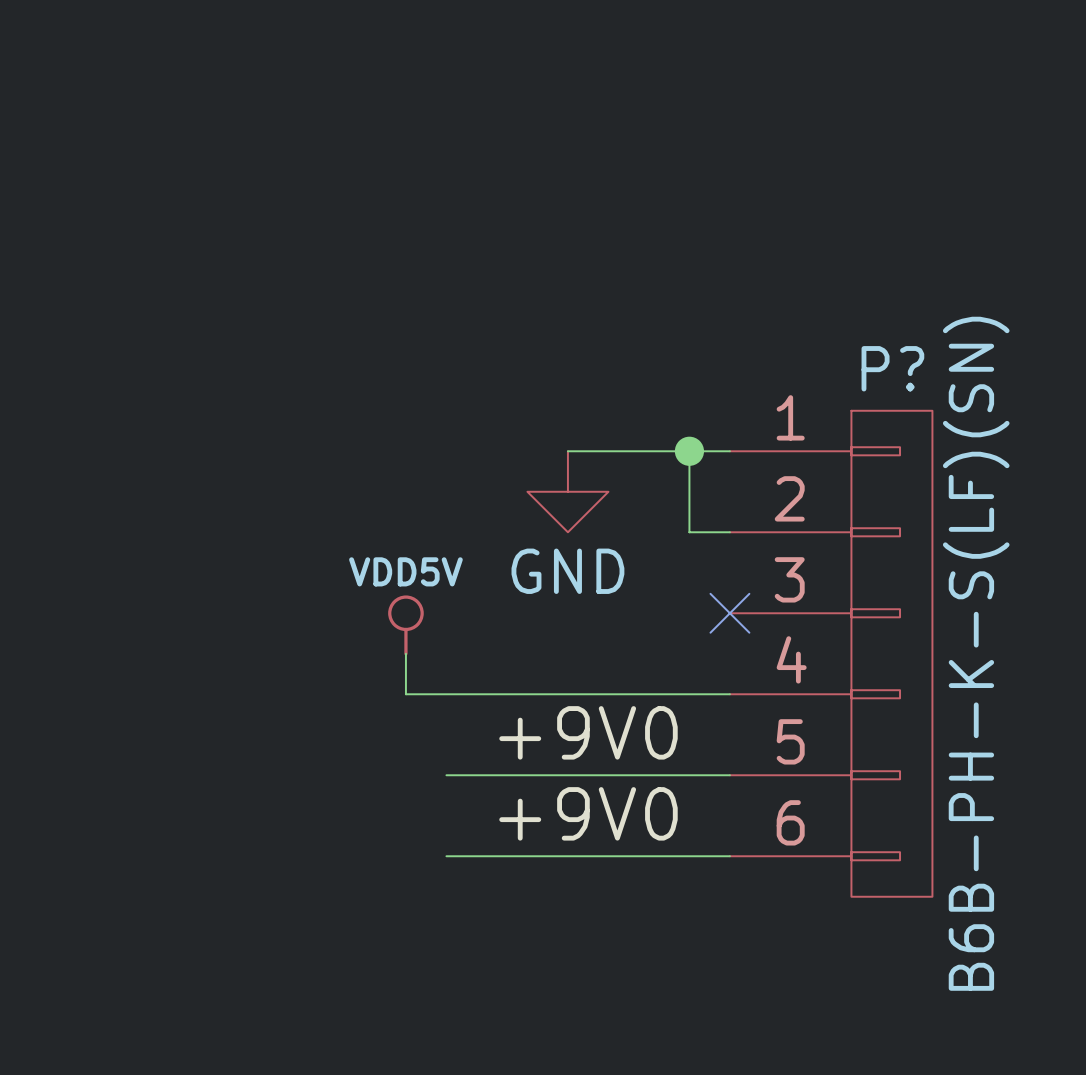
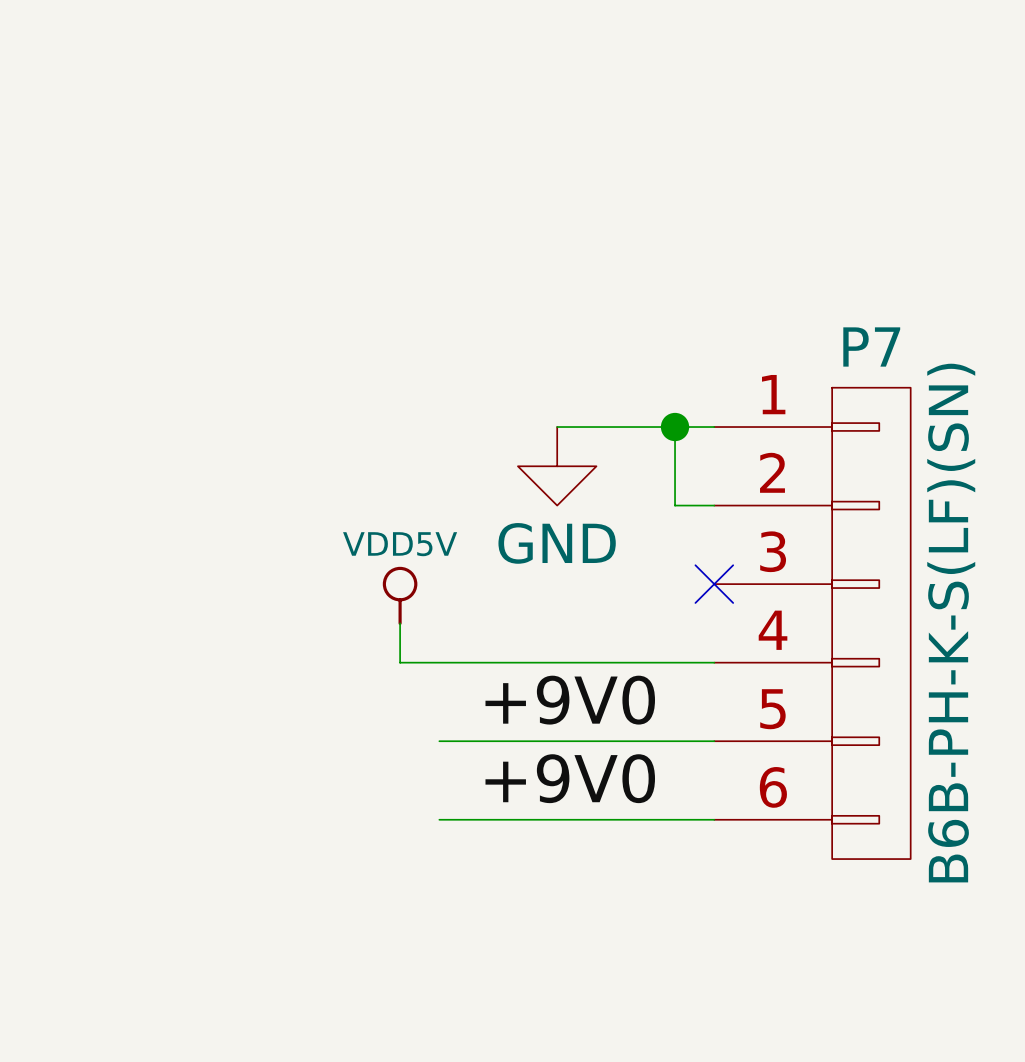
P? name: P? (892, 368) -> P7 (871, 346)

